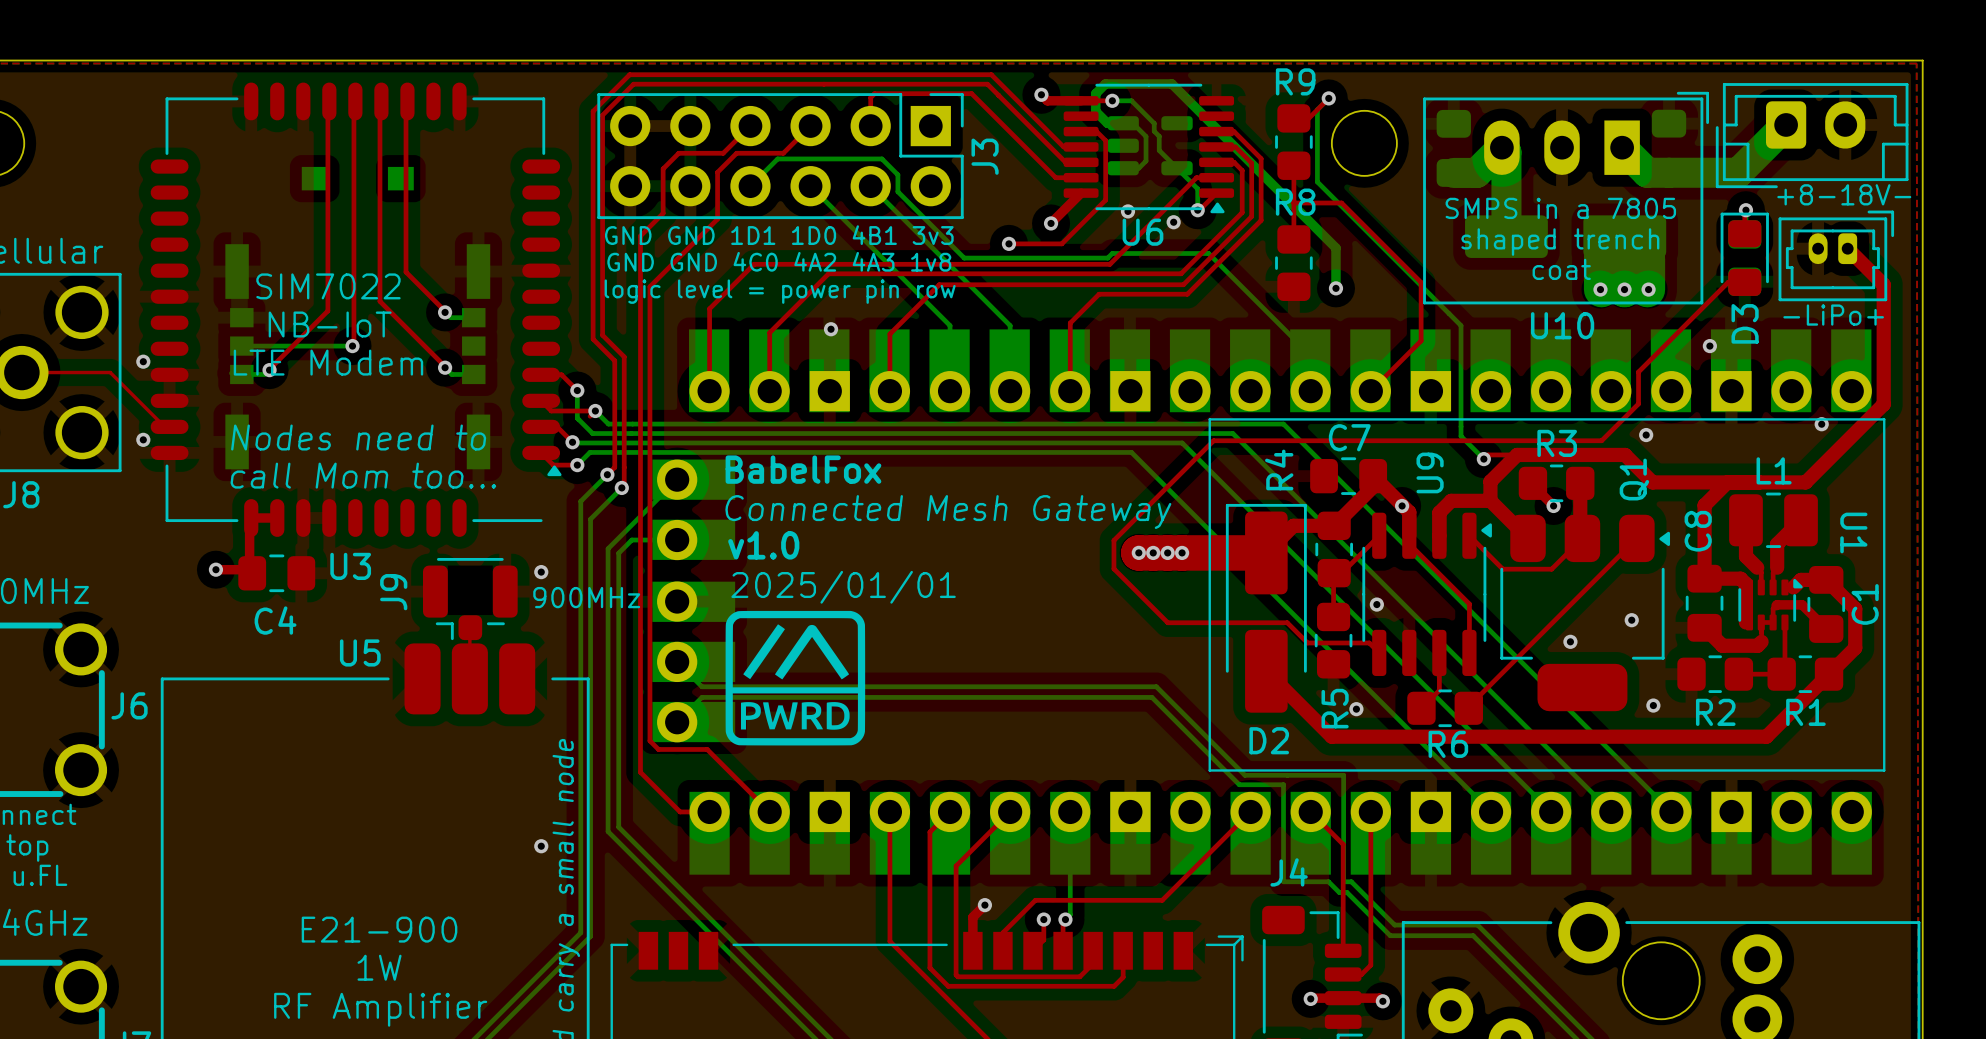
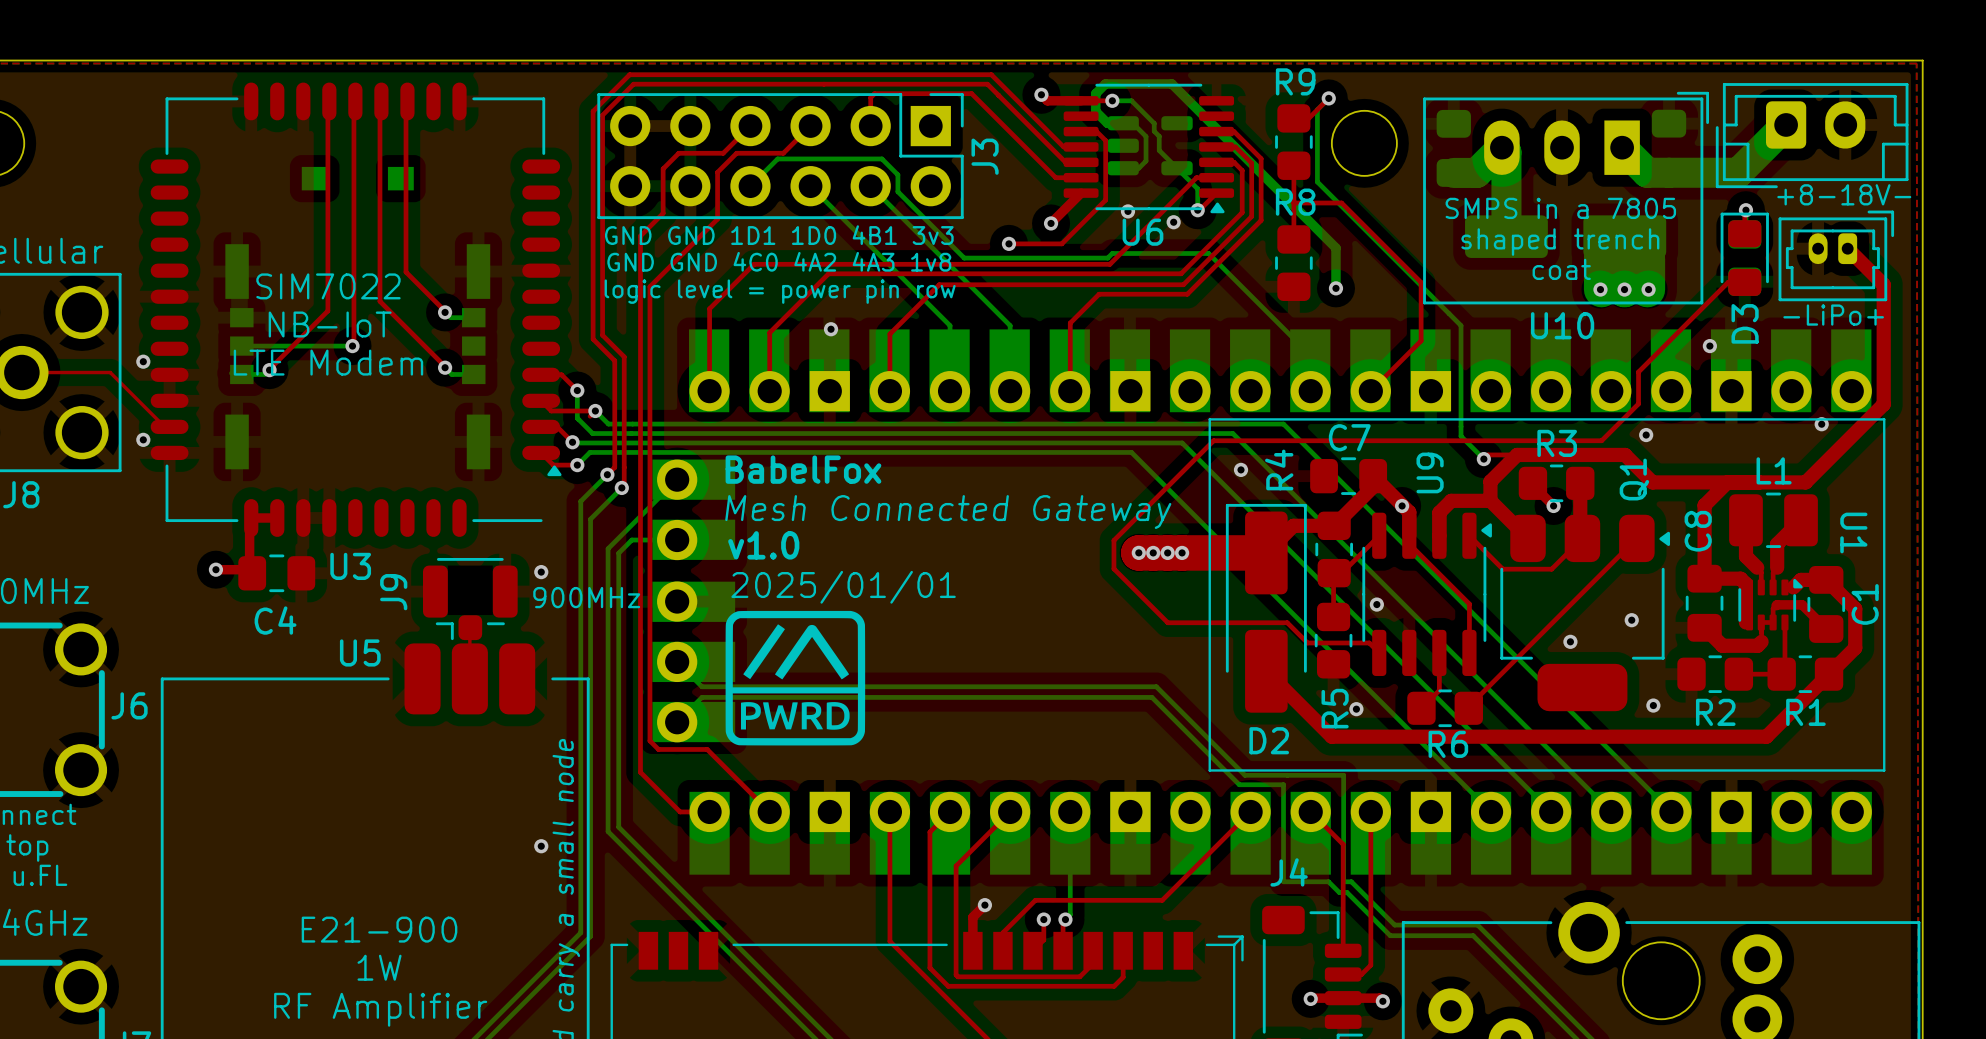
text: Nodes need to (358, 437) -> none
via: none -> (1241, 469)
text: call Mom too... (363, 475) -> none
text: Connected Mesh Gateway (948, 512) -> Mesh Connected Gateway (948, 512)

